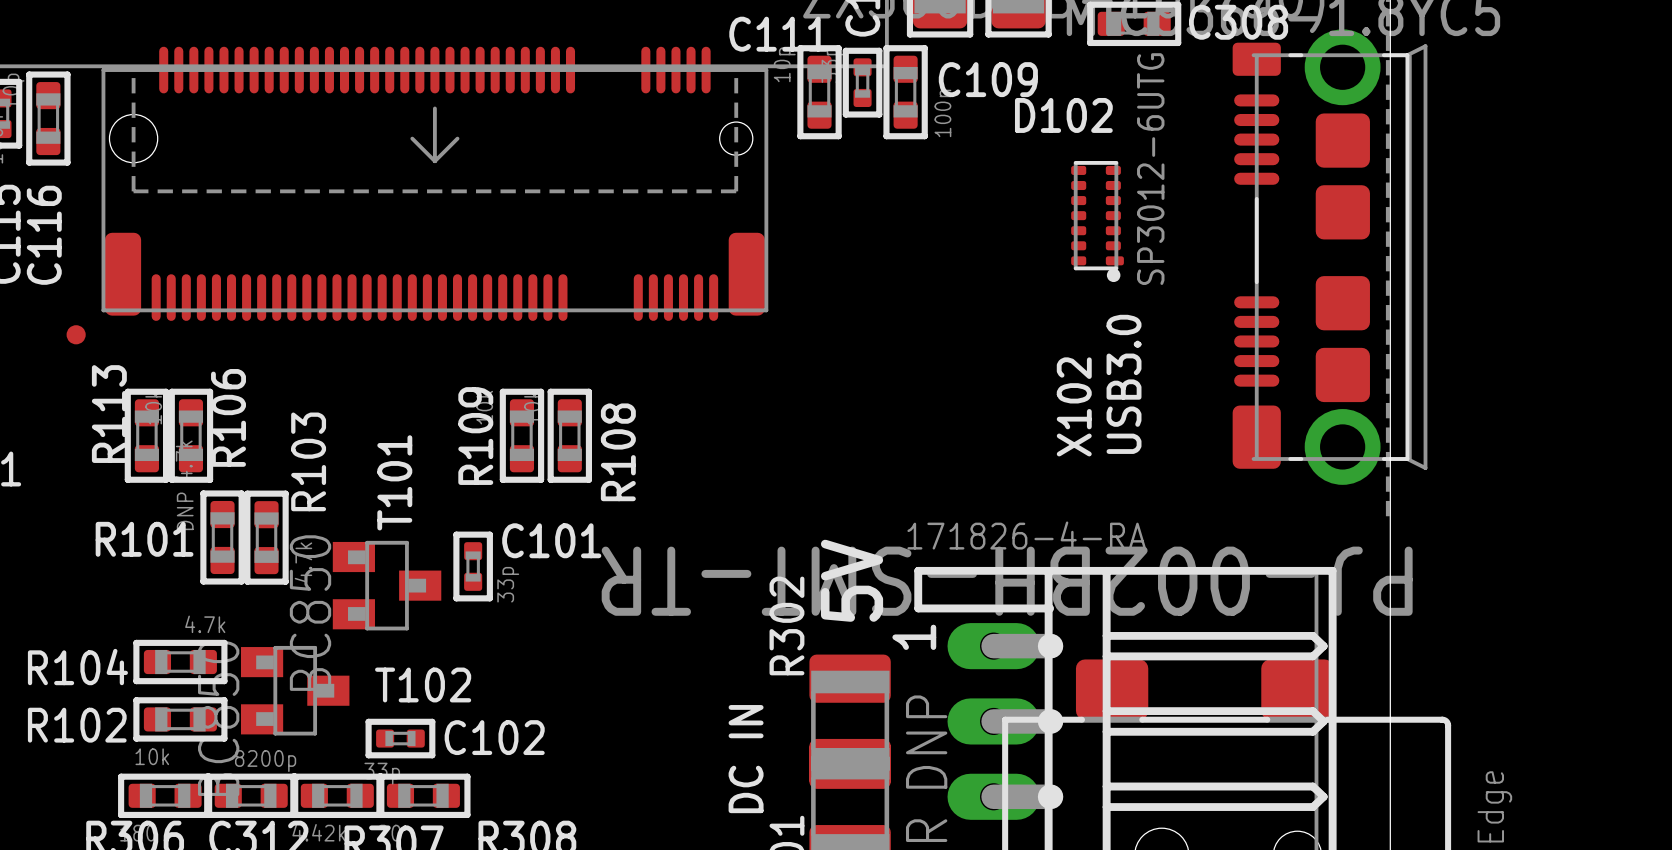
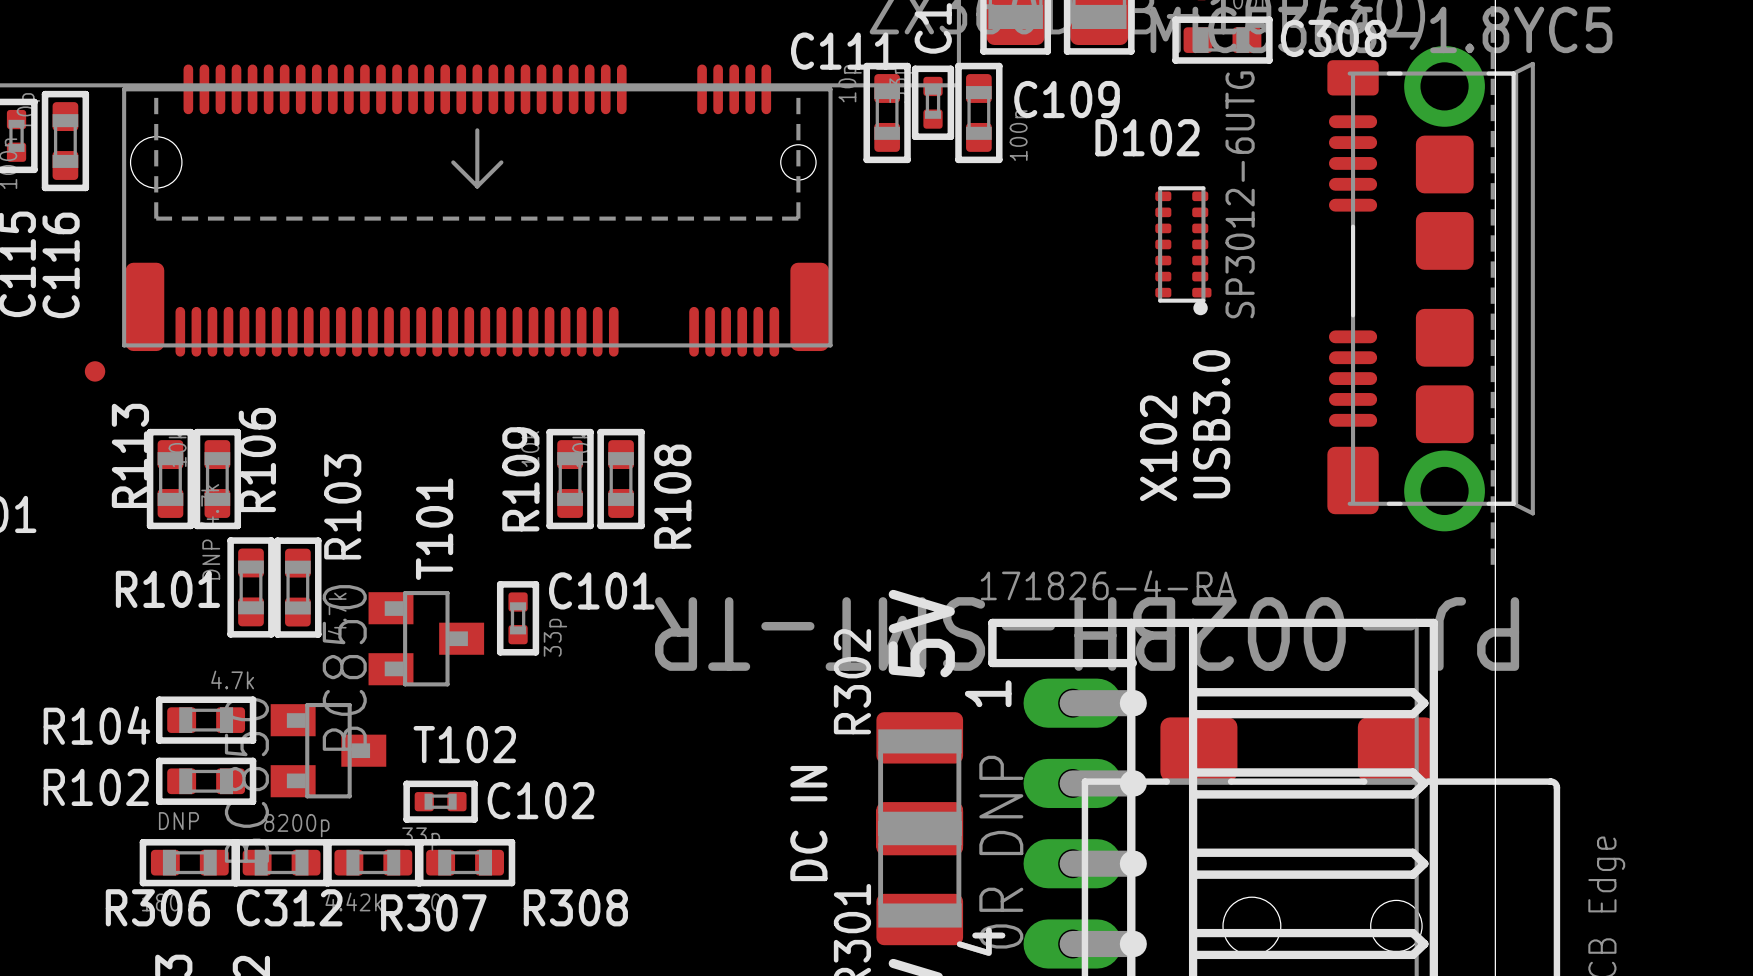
R102 value: 10k (152, 756) -> DNP (178, 821)

